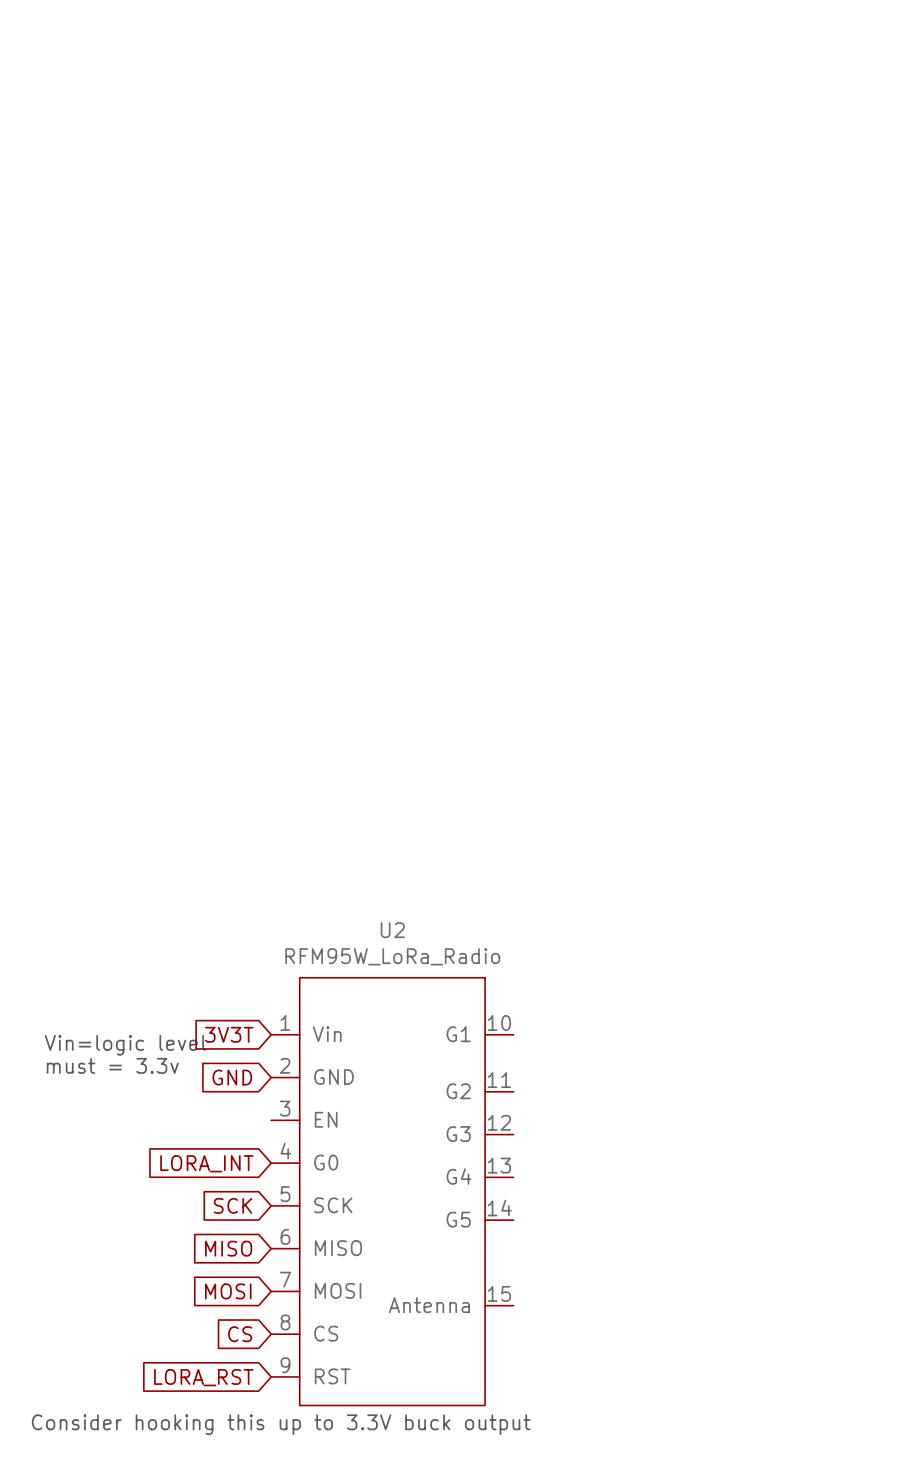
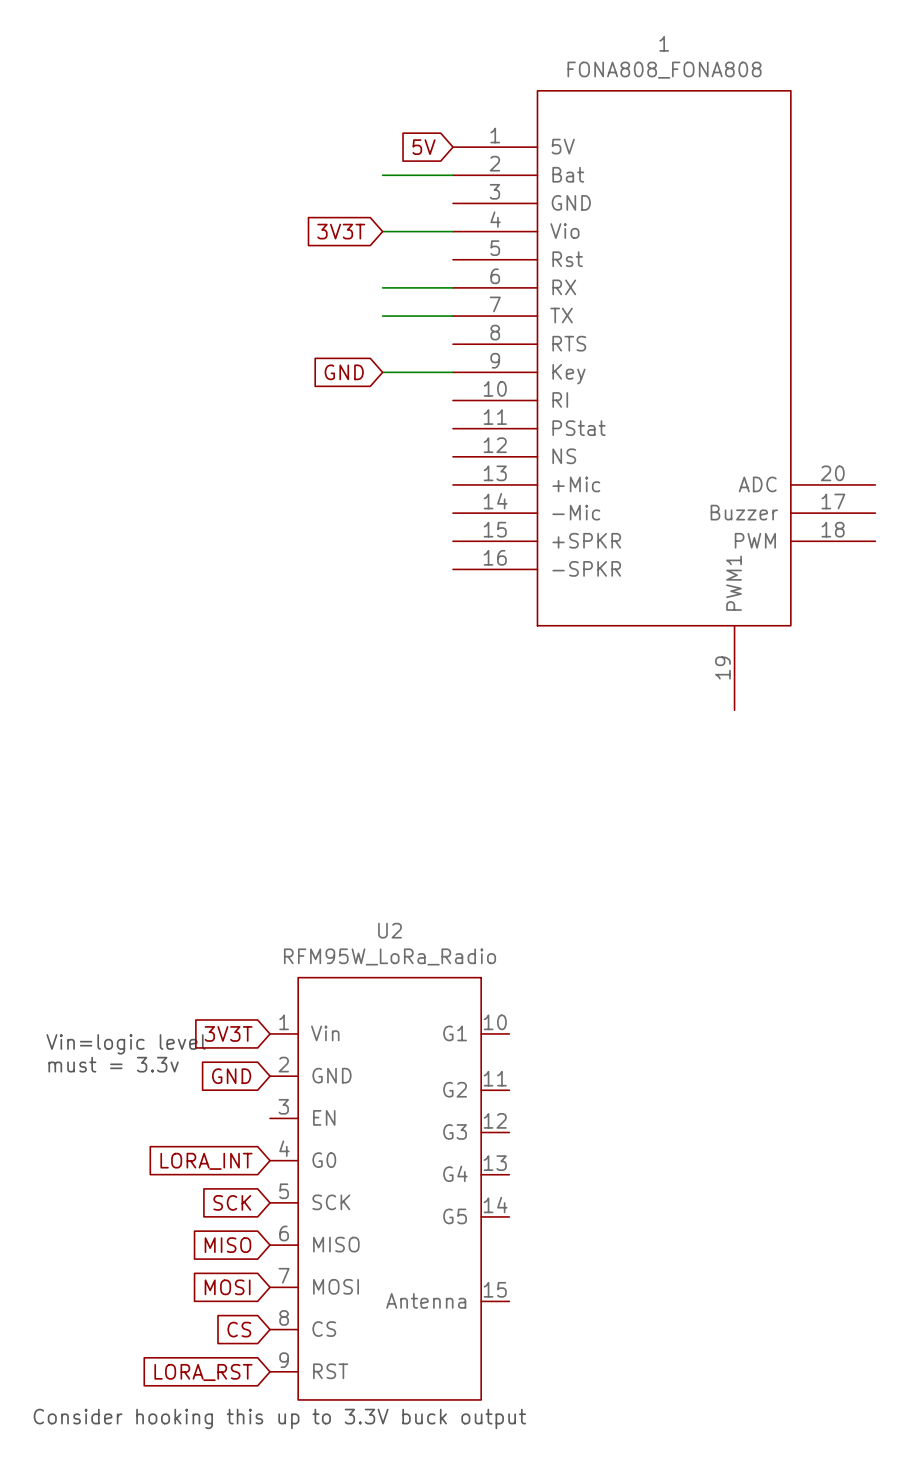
global label: none -> 5V (424, 147)
wire: none -> (382, 175) (453, 175)
global label: none -> 3V3T (341, 231)
wire: none -> (382, 231) (453, 231)
wire: none -> (382, 287) (453, 287)
wire: none -> (382, 316) (453, 316)
global label: none -> GND (344, 372)
wire: none -> (382, 372) (453, 372)
1: none -> FONA808_FONA808 (664, 400)

